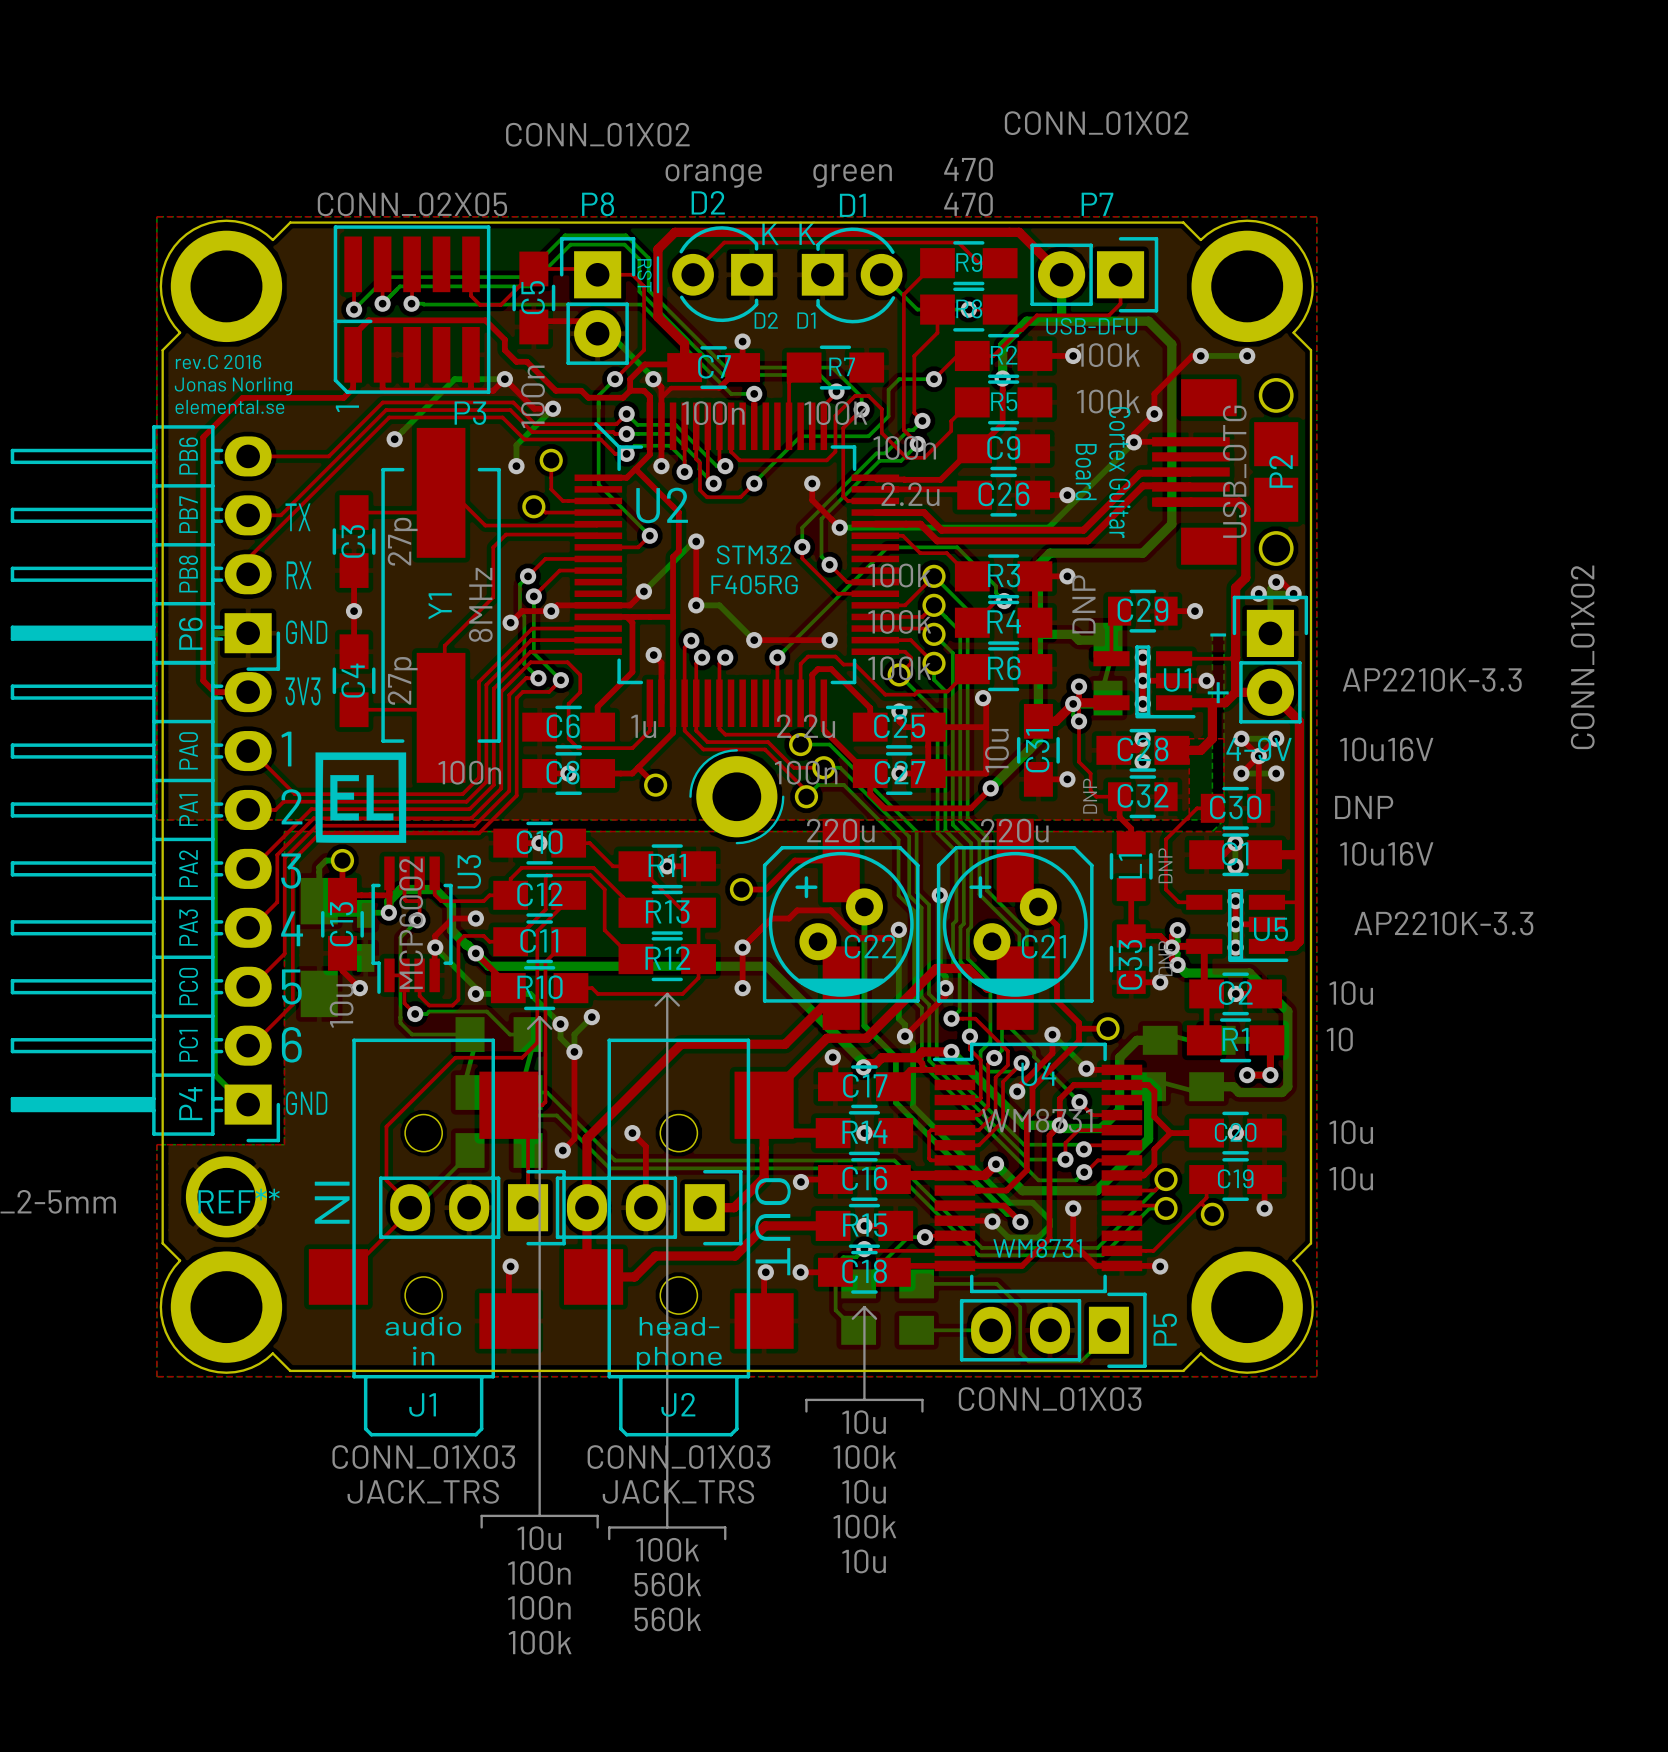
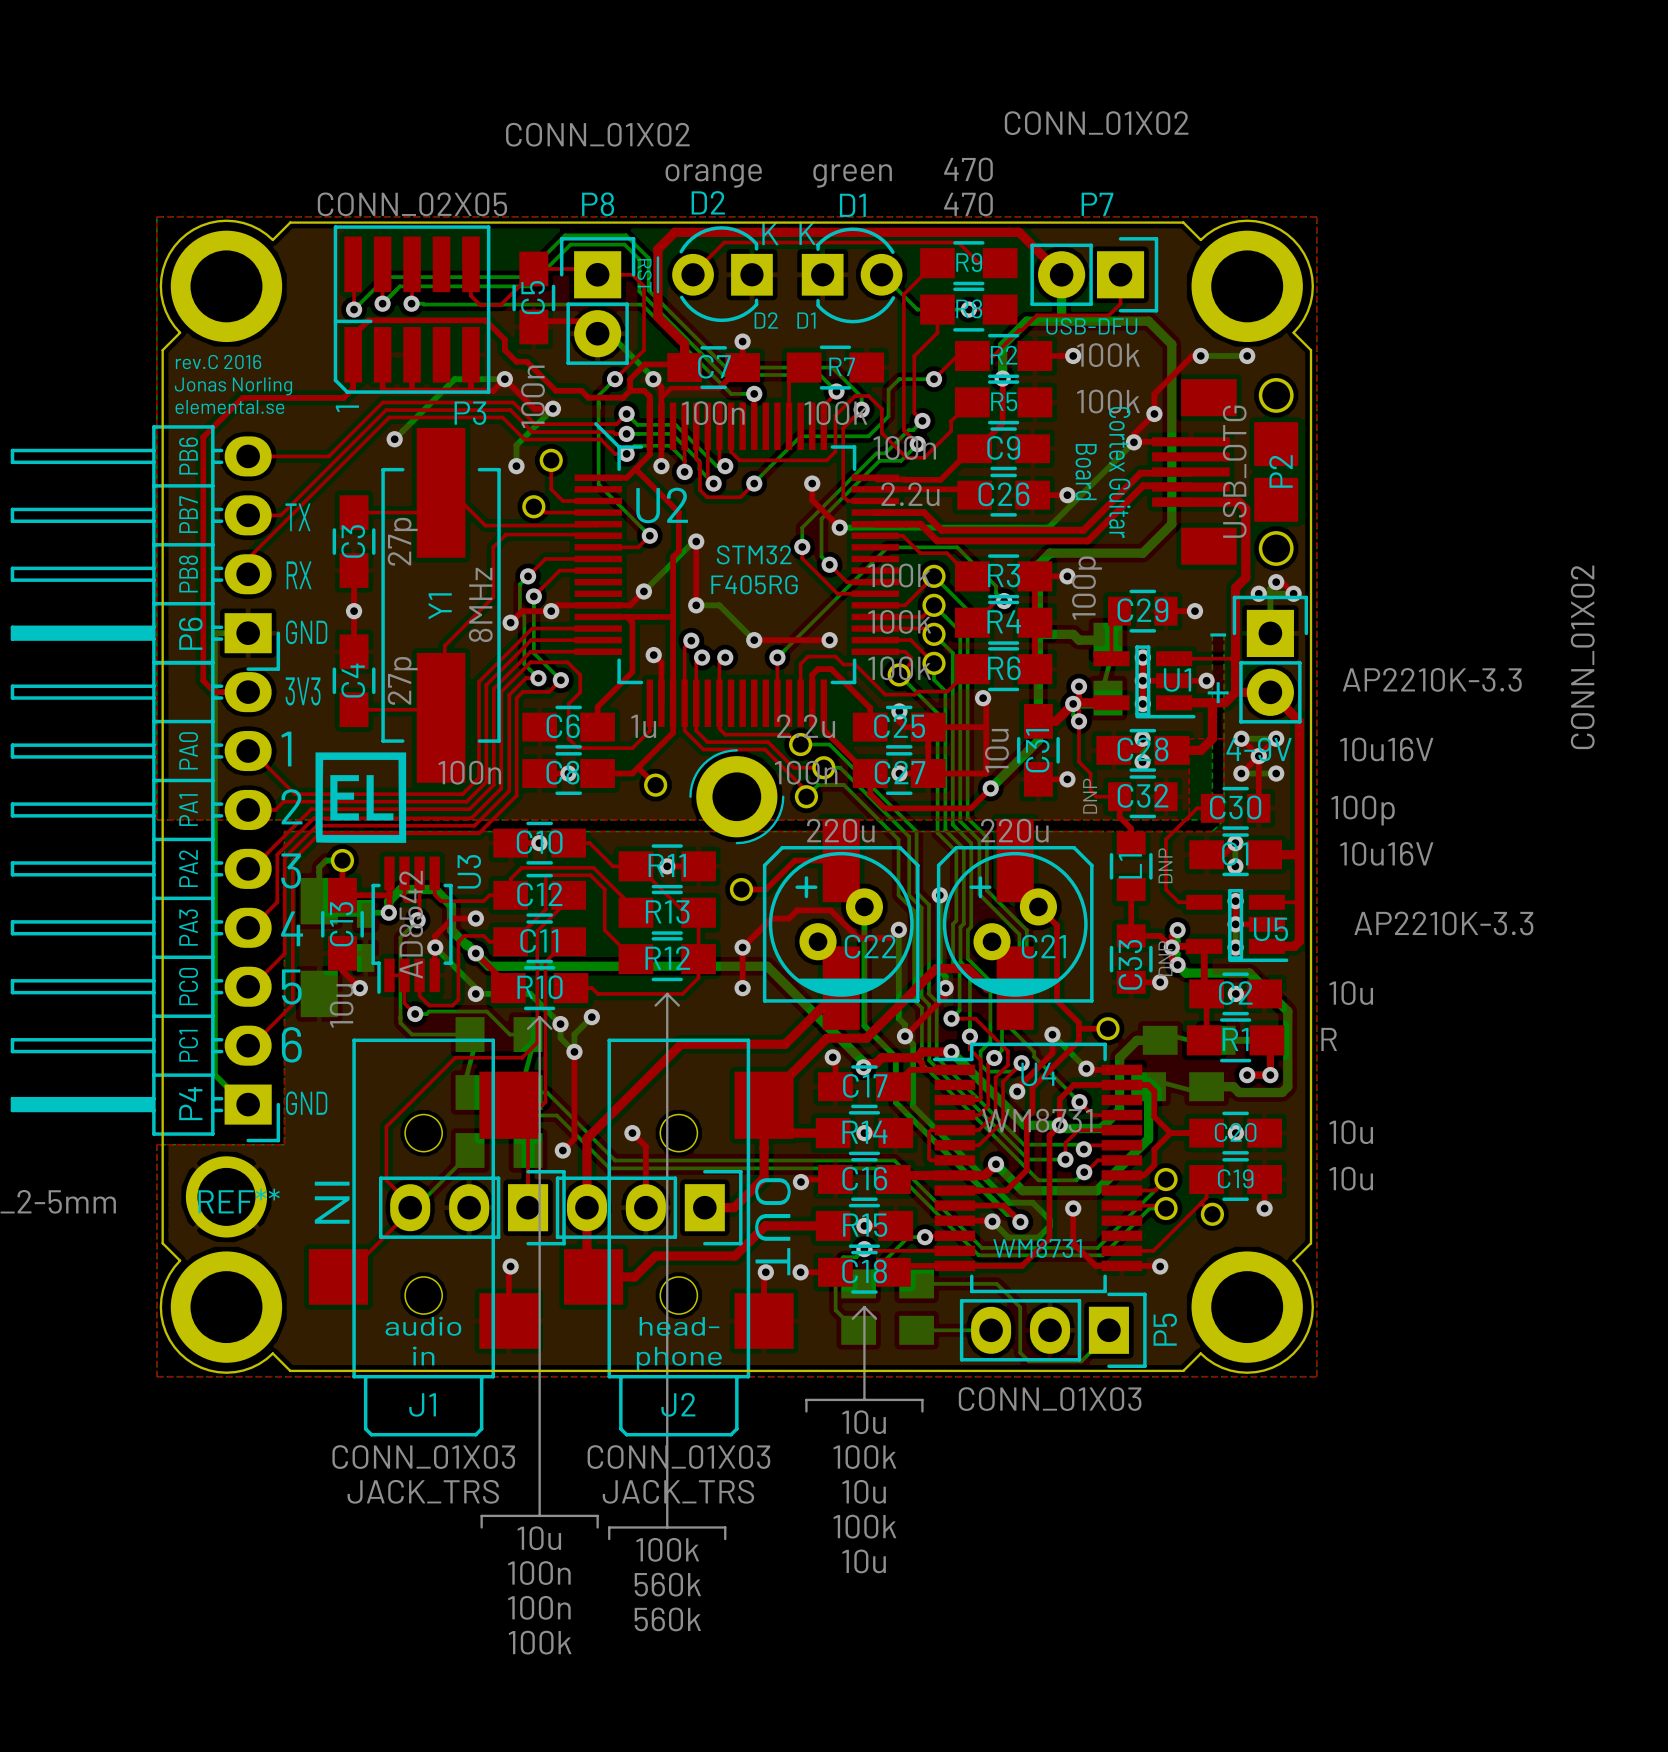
C29 value: DNP (1083, 604) -> 100p (1087, 588)
C30 value: DNP (1364, 807) -> 100p (1363, 810)
U3 value: MCP6002 (411, 923) -> AD8542 (411, 924)
R1 value: 10 (1339, 1039) -> R (1329, 1039)

